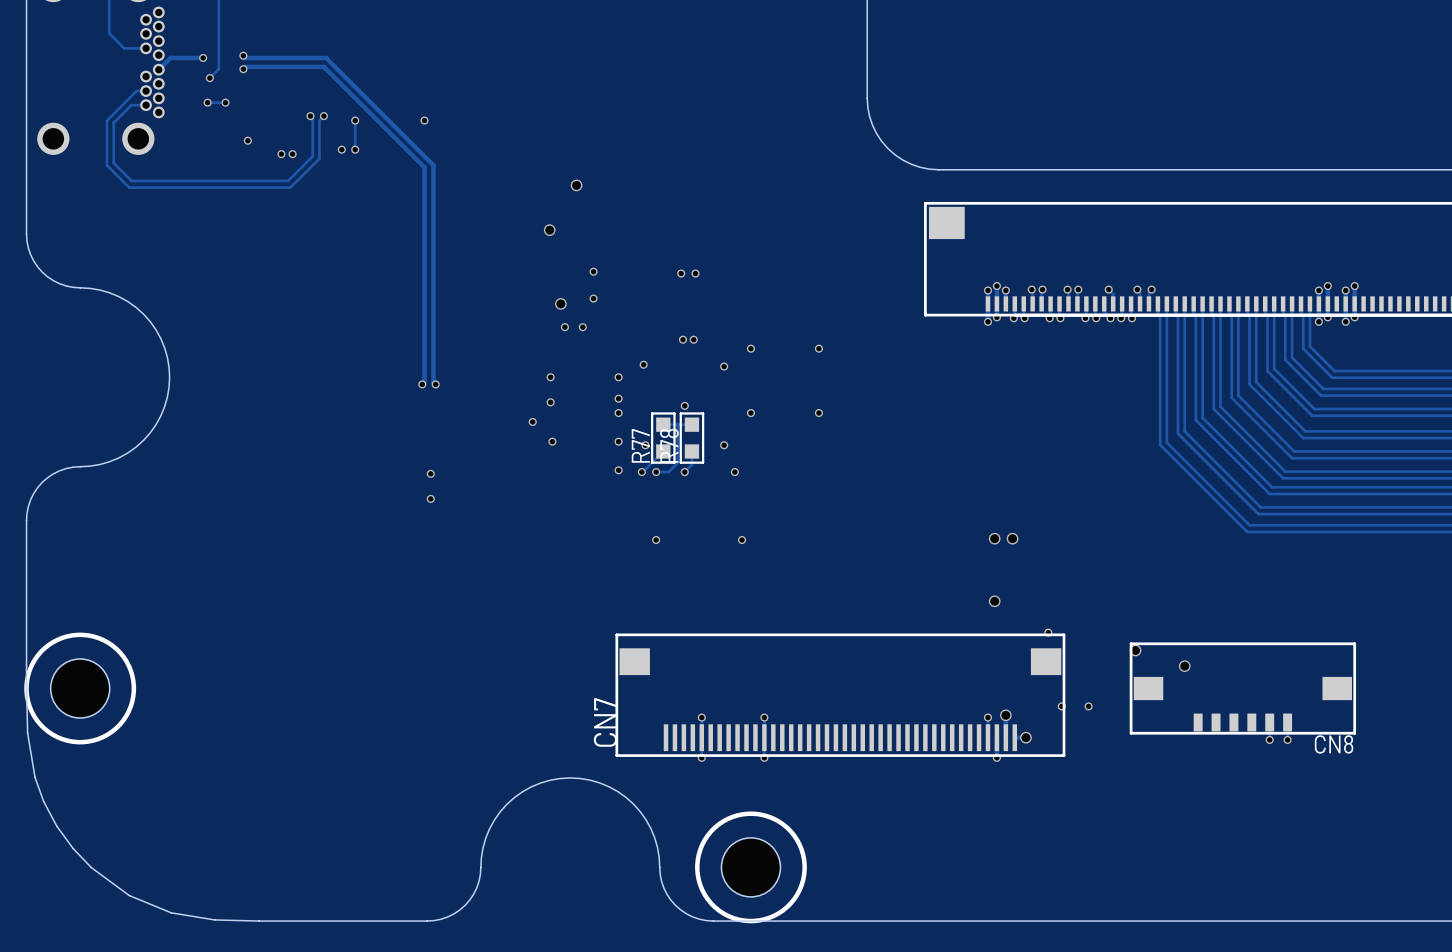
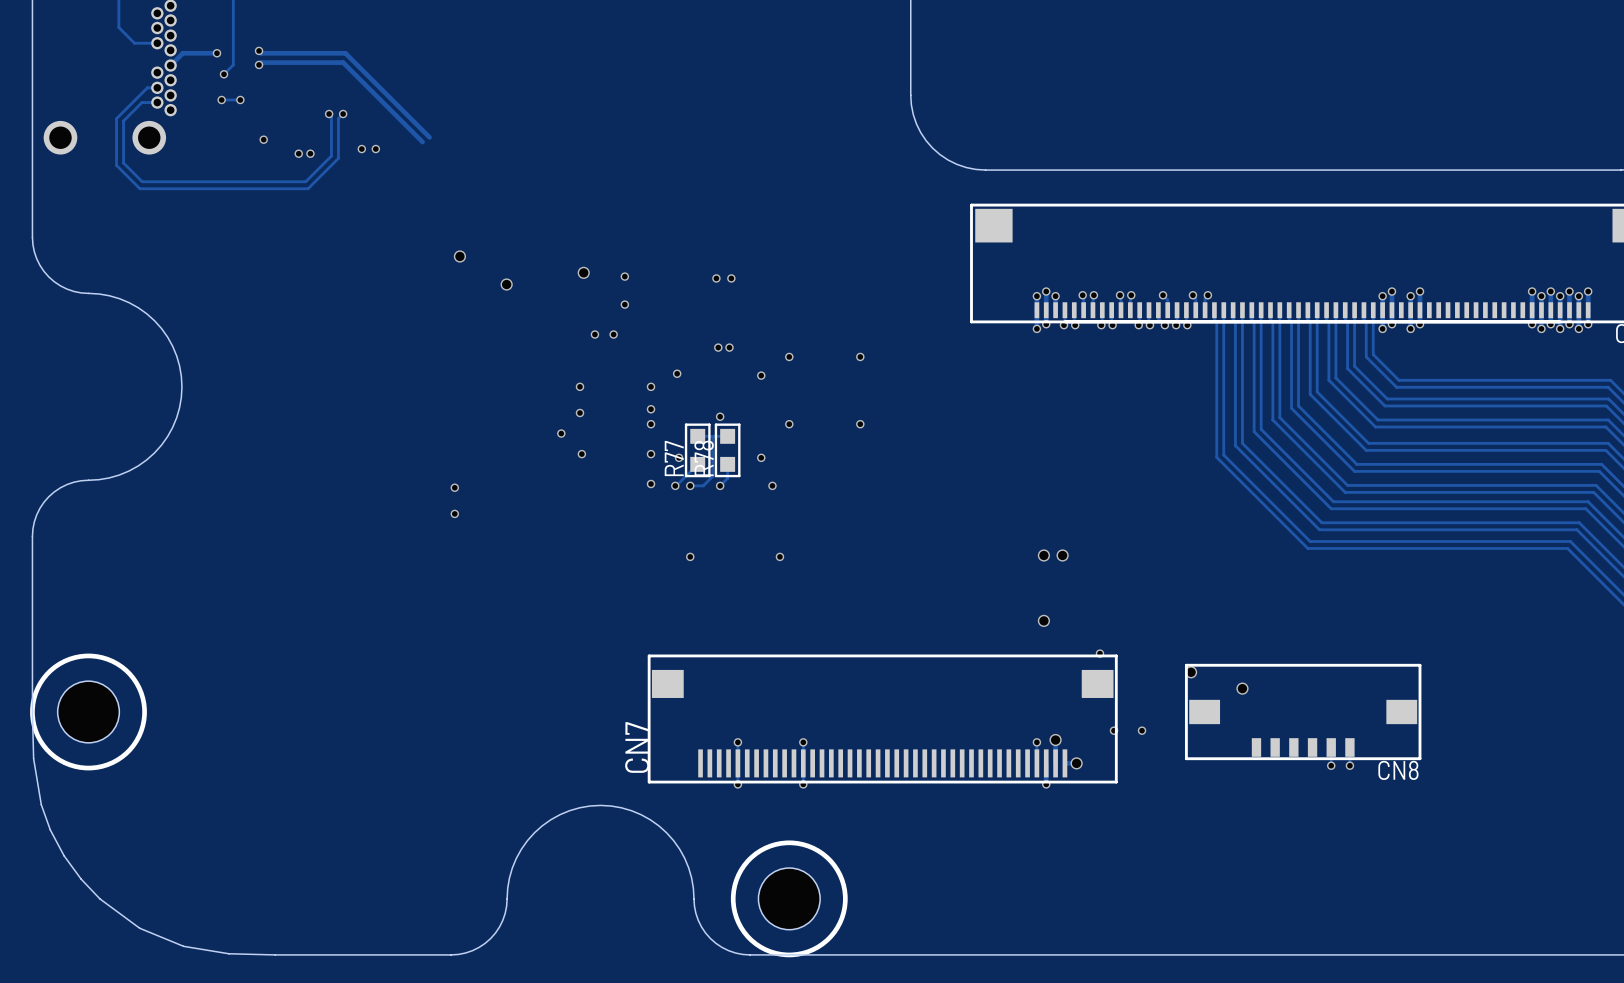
track: (355, 120) (355, 149) -> none
via: (355, 120) -> none
via: (424, 120) -> none
track: (406, 138) (433, 165) (433, 382) (435, 384) -> none
track: (399, 142) (424, 167) (424, 382) (422, 384) -> none
via: (576, 185) -> none
via: (549, 230) -> none
via: none -> (459, 256)
via: none -> (583, 272)
via: none -> (506, 284)
via: (560, 303) -> none
via: (422, 384) -> none
via: (435, 384) -> none

